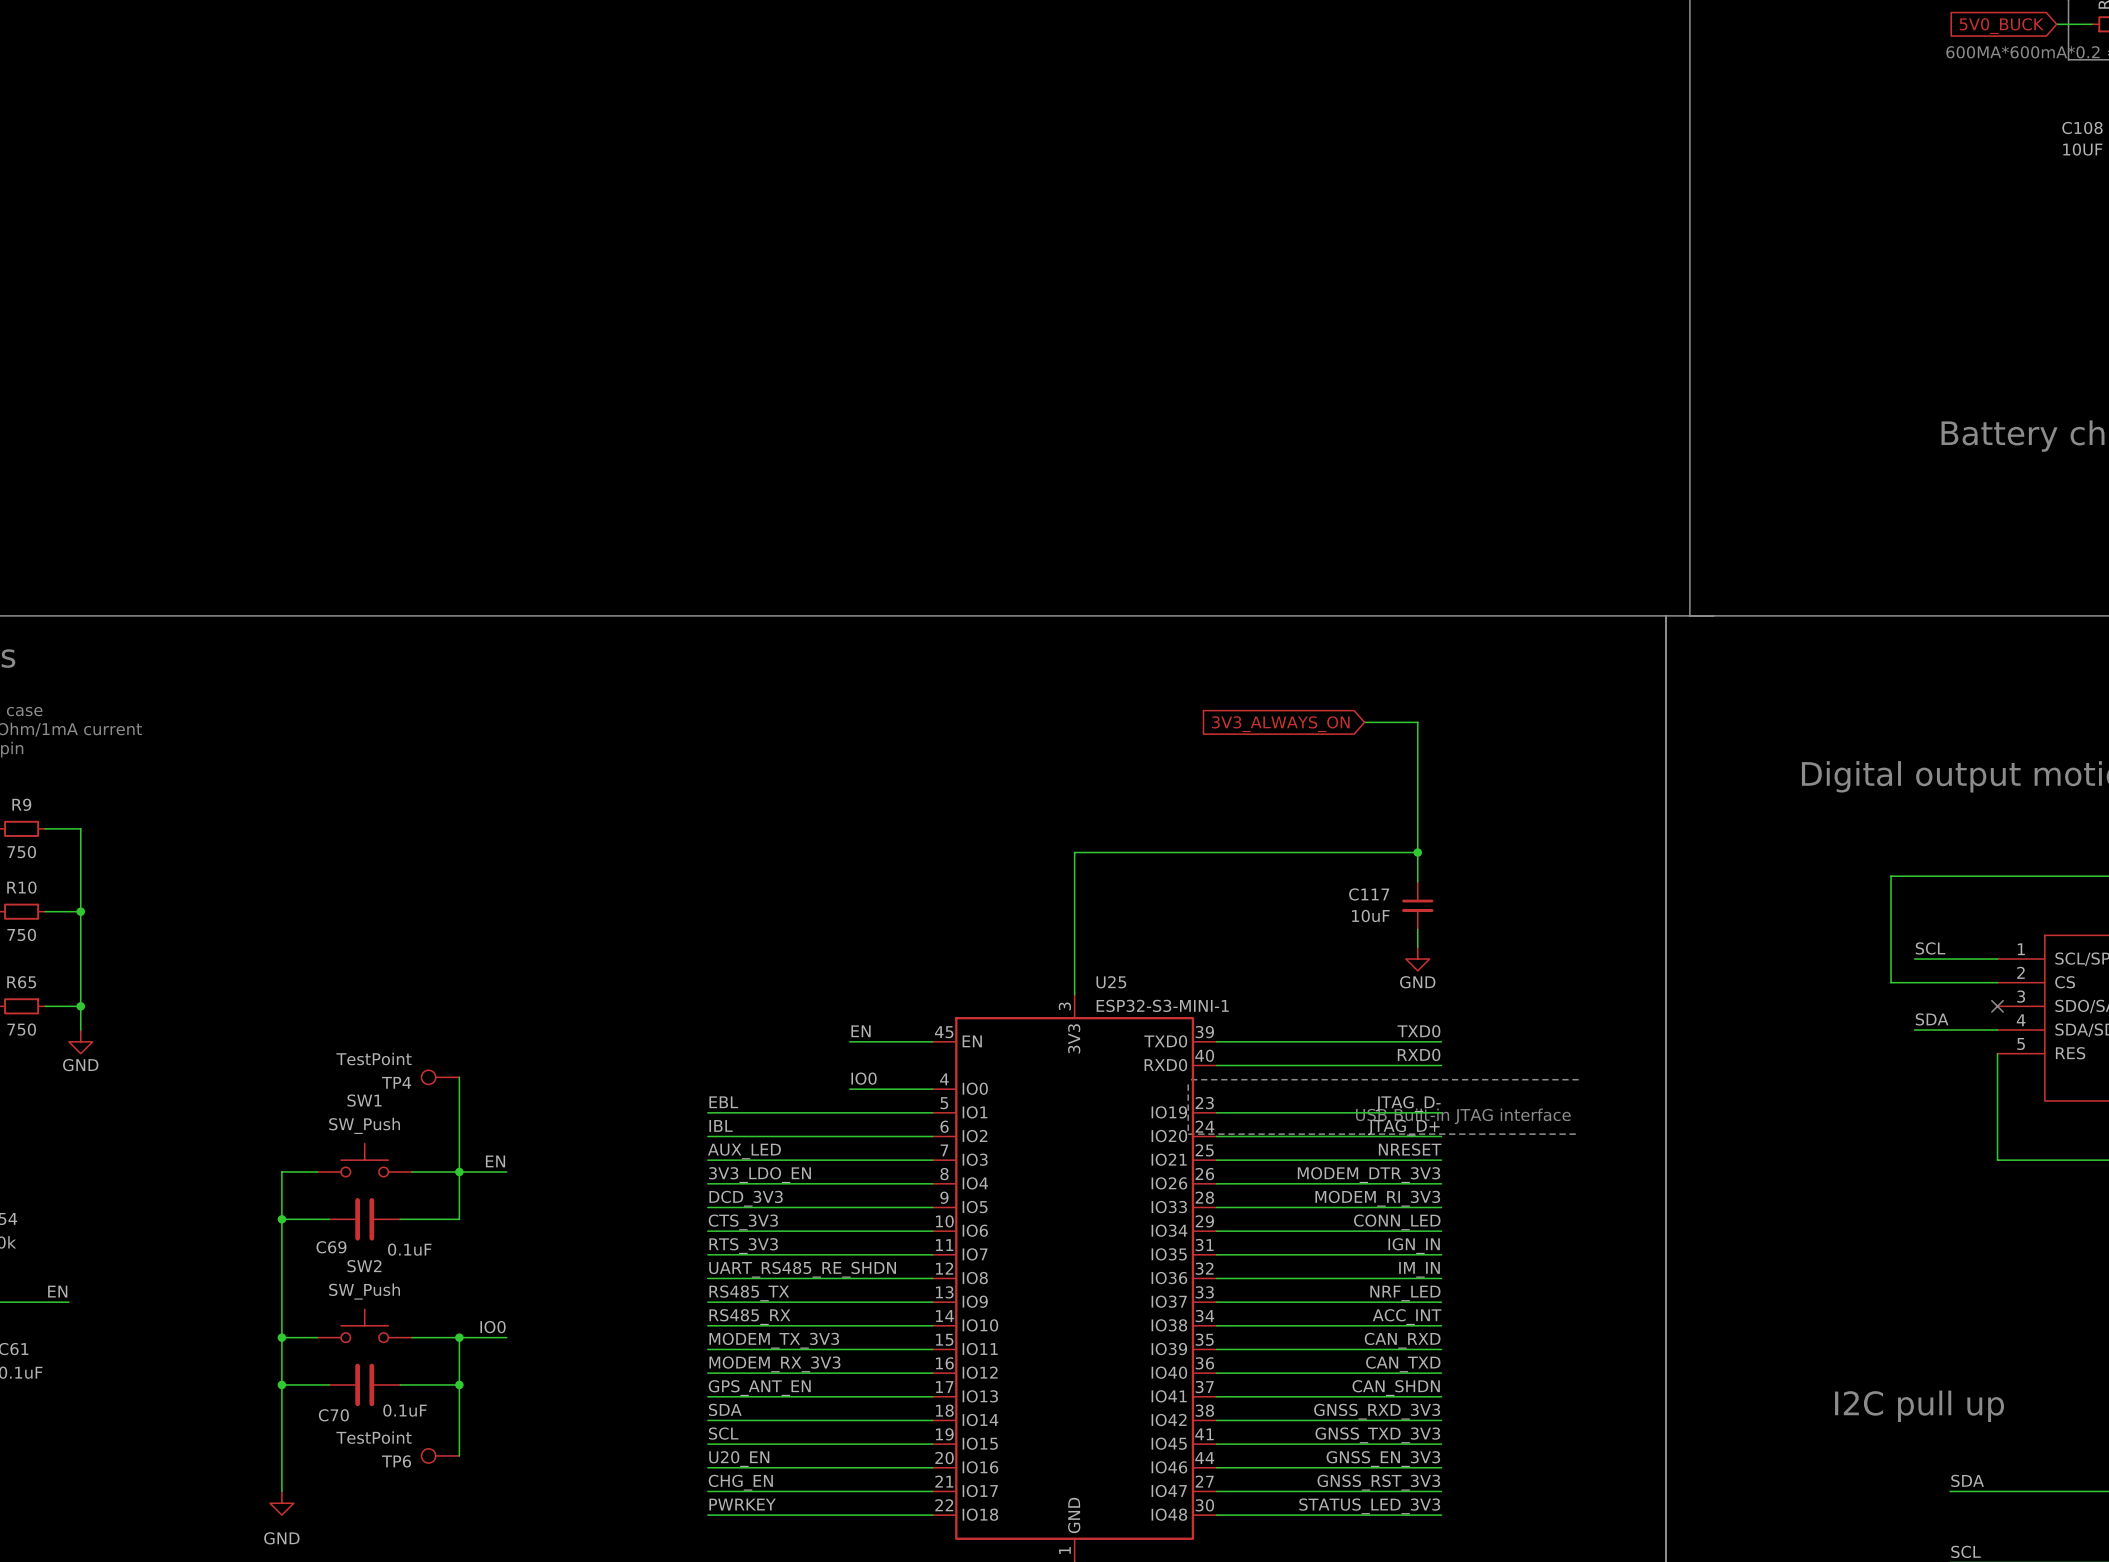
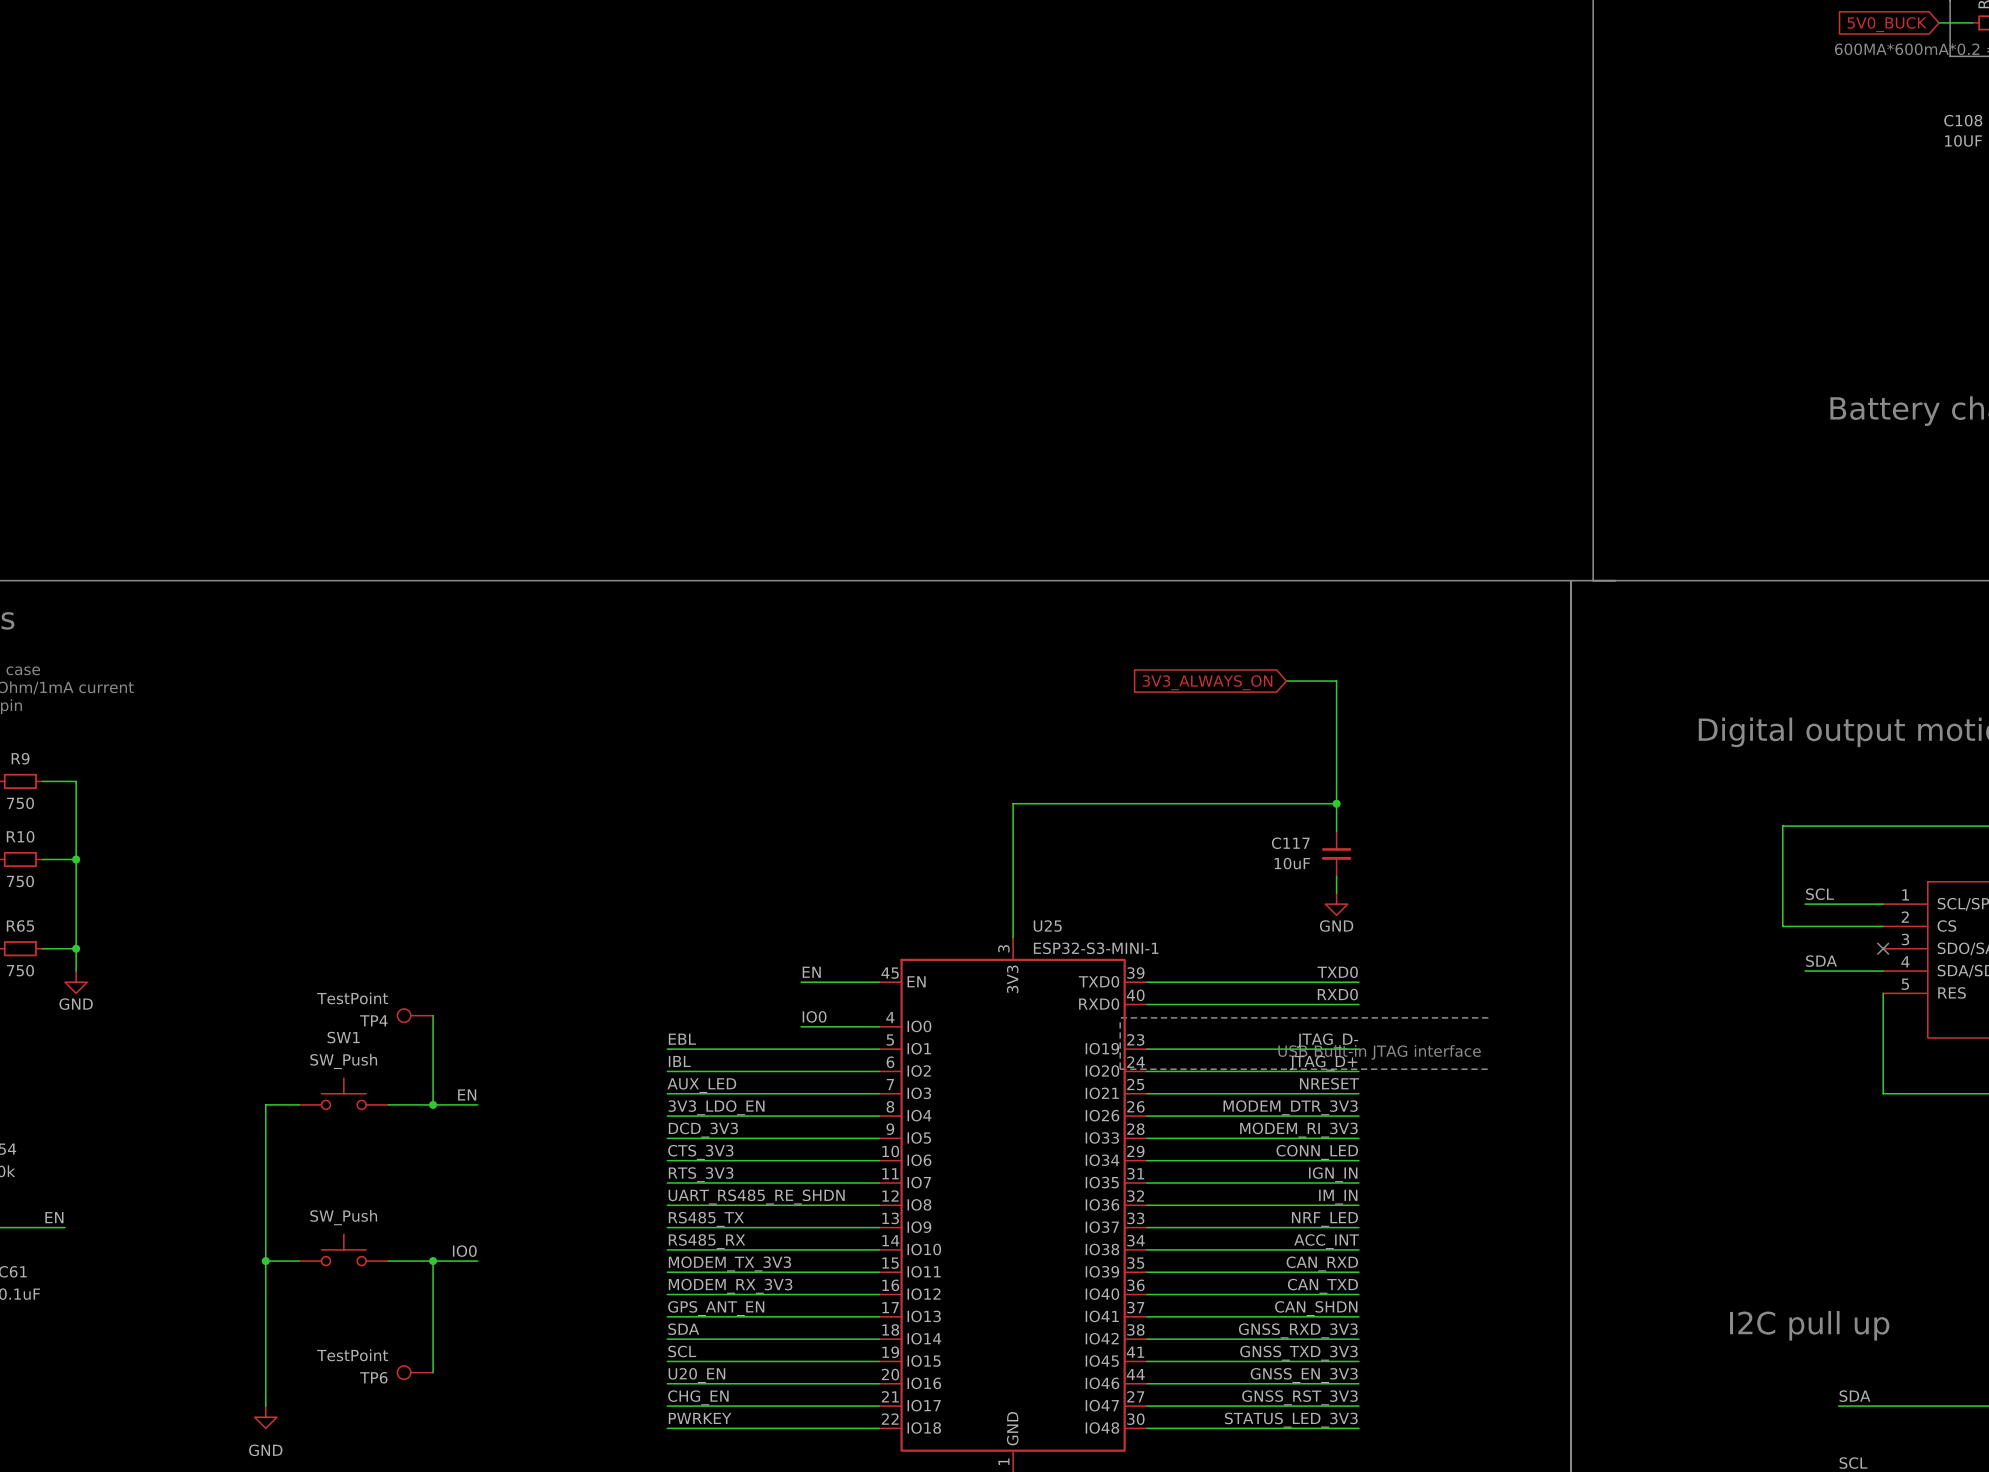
wire: (459, 1171) (459, 1219) (400, 1219) -> none
wire: (281, 1219) (329, 1219) -> none
junction: (281, 1219) -> none
C69: 0.1uF (364, 1219) -> none
SW2 name: SW2 (364, 1266) -> none
wire: (281, 1384) (329, 1384) -> none
junction: (281, 1384) -> none
C70: 0.1uF (364, 1384) -> none
wire: (400, 1384) (459, 1384) -> none
junction: (459, 1384) -> none

